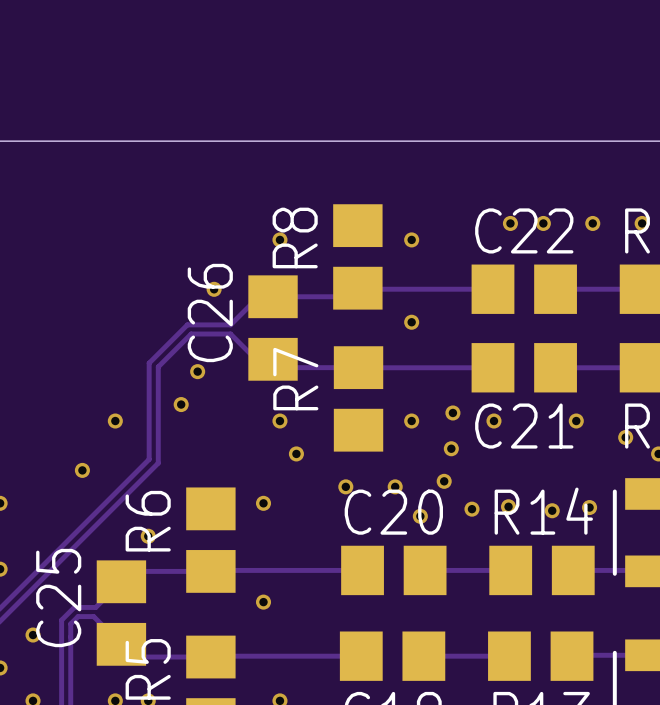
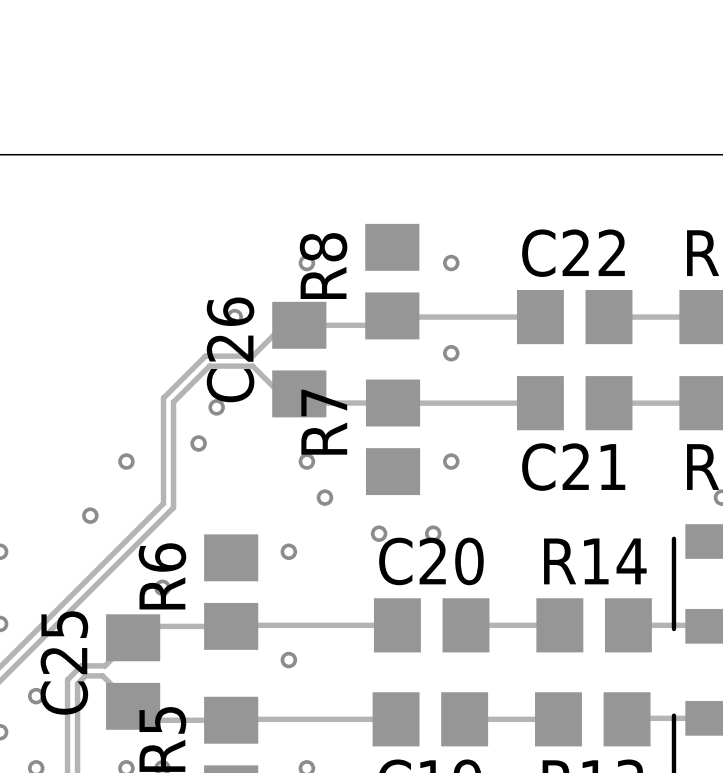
via: (510, 223) -> none
via: (543, 223) -> none
via: (592, 223) -> none
via: (642, 223) -> none
via: (452, 412) -> none
via: (493, 421) -> none
via: (576, 421) -> none
via: (625, 437) -> none
via: (451, 448) -> none
via: (444, 481) -> none
via: (508, 506) -> none
via: (589, 507) -> none
via: (471, 509) -> none
via: (552, 510) -> none
via: (420, 516) -> none

